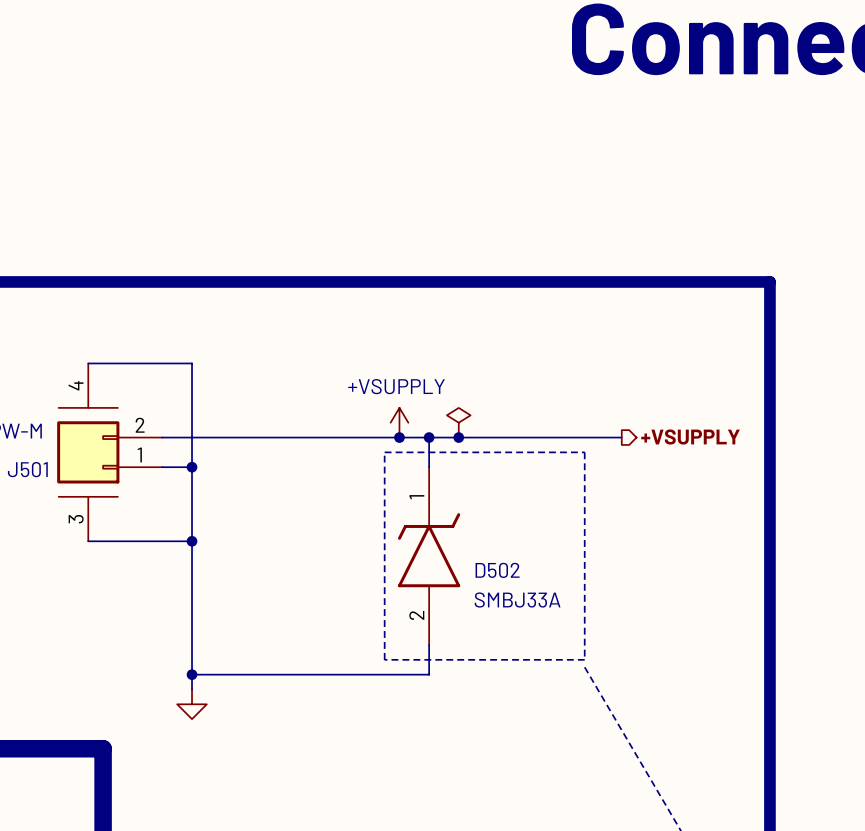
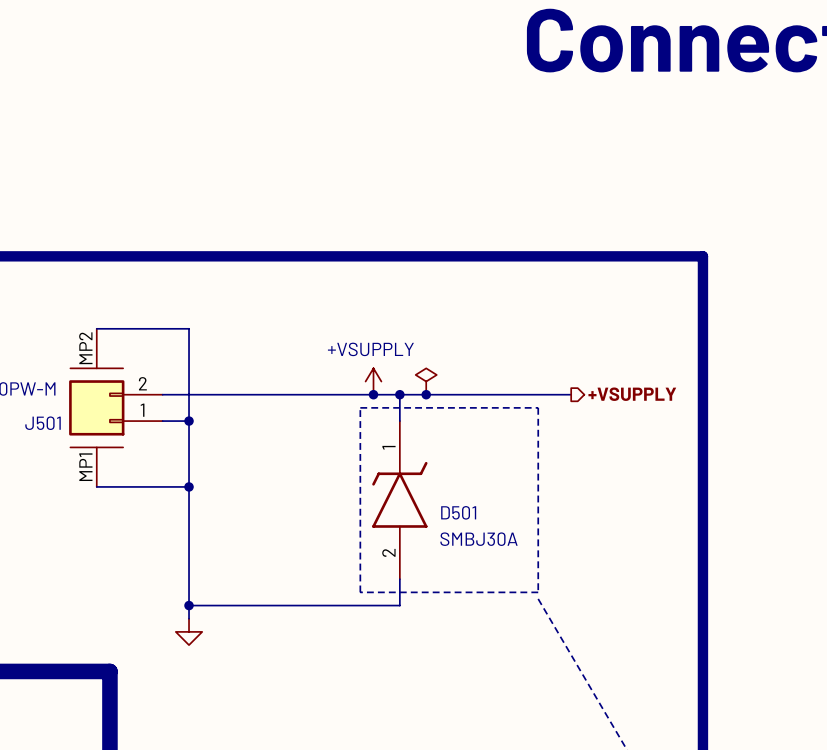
J501 pin number: 4 (76, 385) -> MP2 (85, 348)
J501 pin number: 3 (76, 519) -> MP1 (85, 467)
D502 name: D502 (497, 570) -> D501 (458, 512)
D502 value: SMBJ33A (517, 600) -> SMBJ30A (478, 539)

